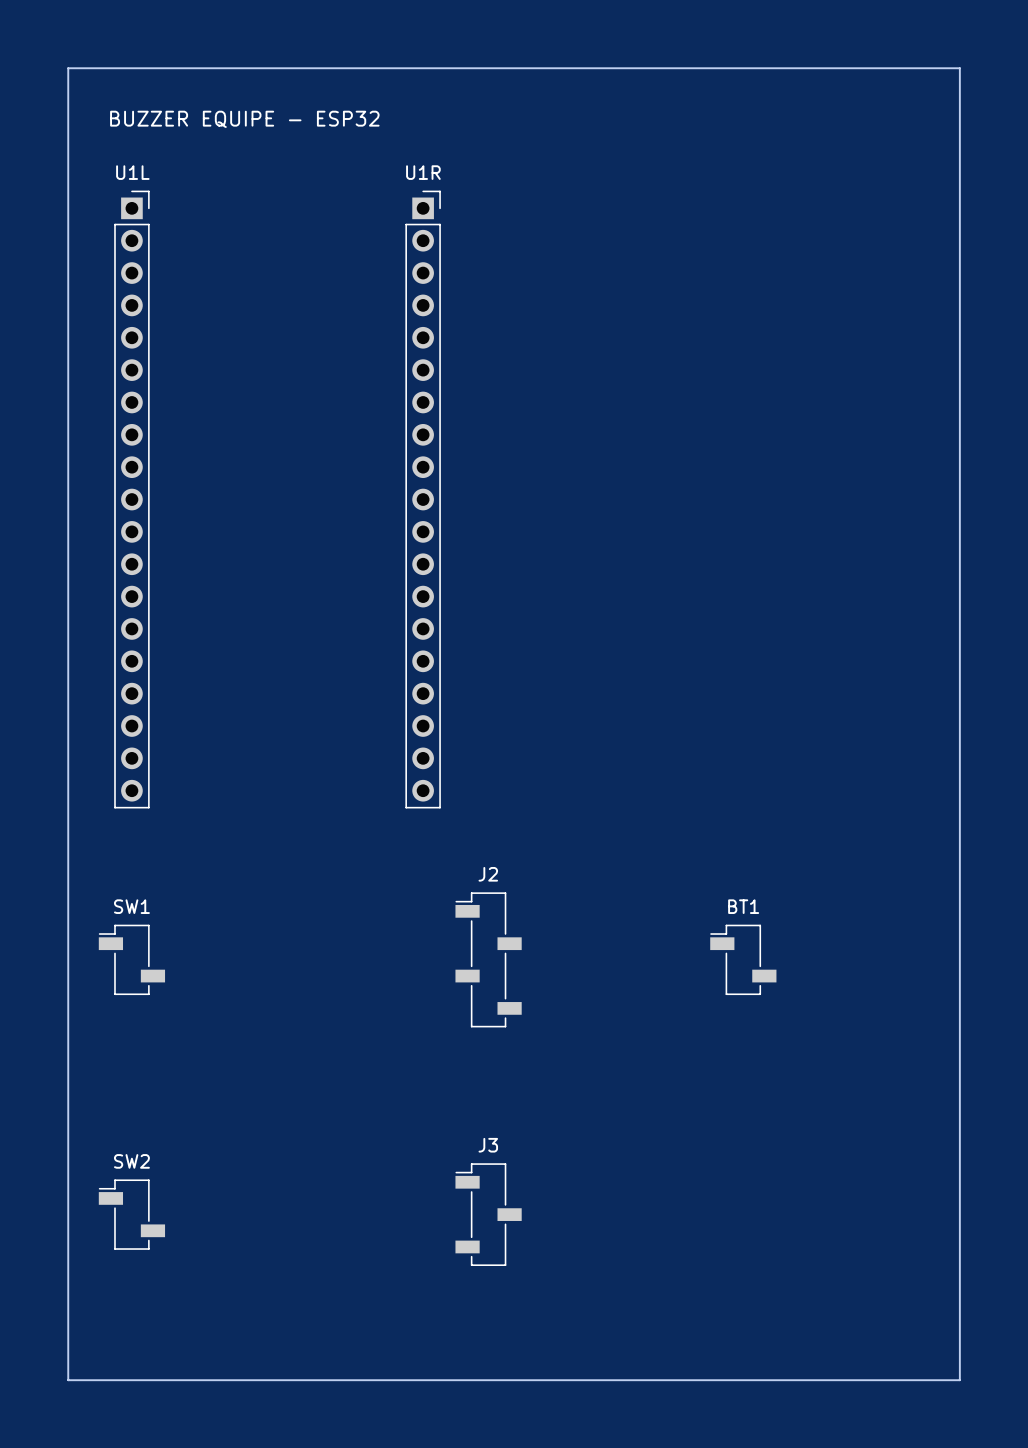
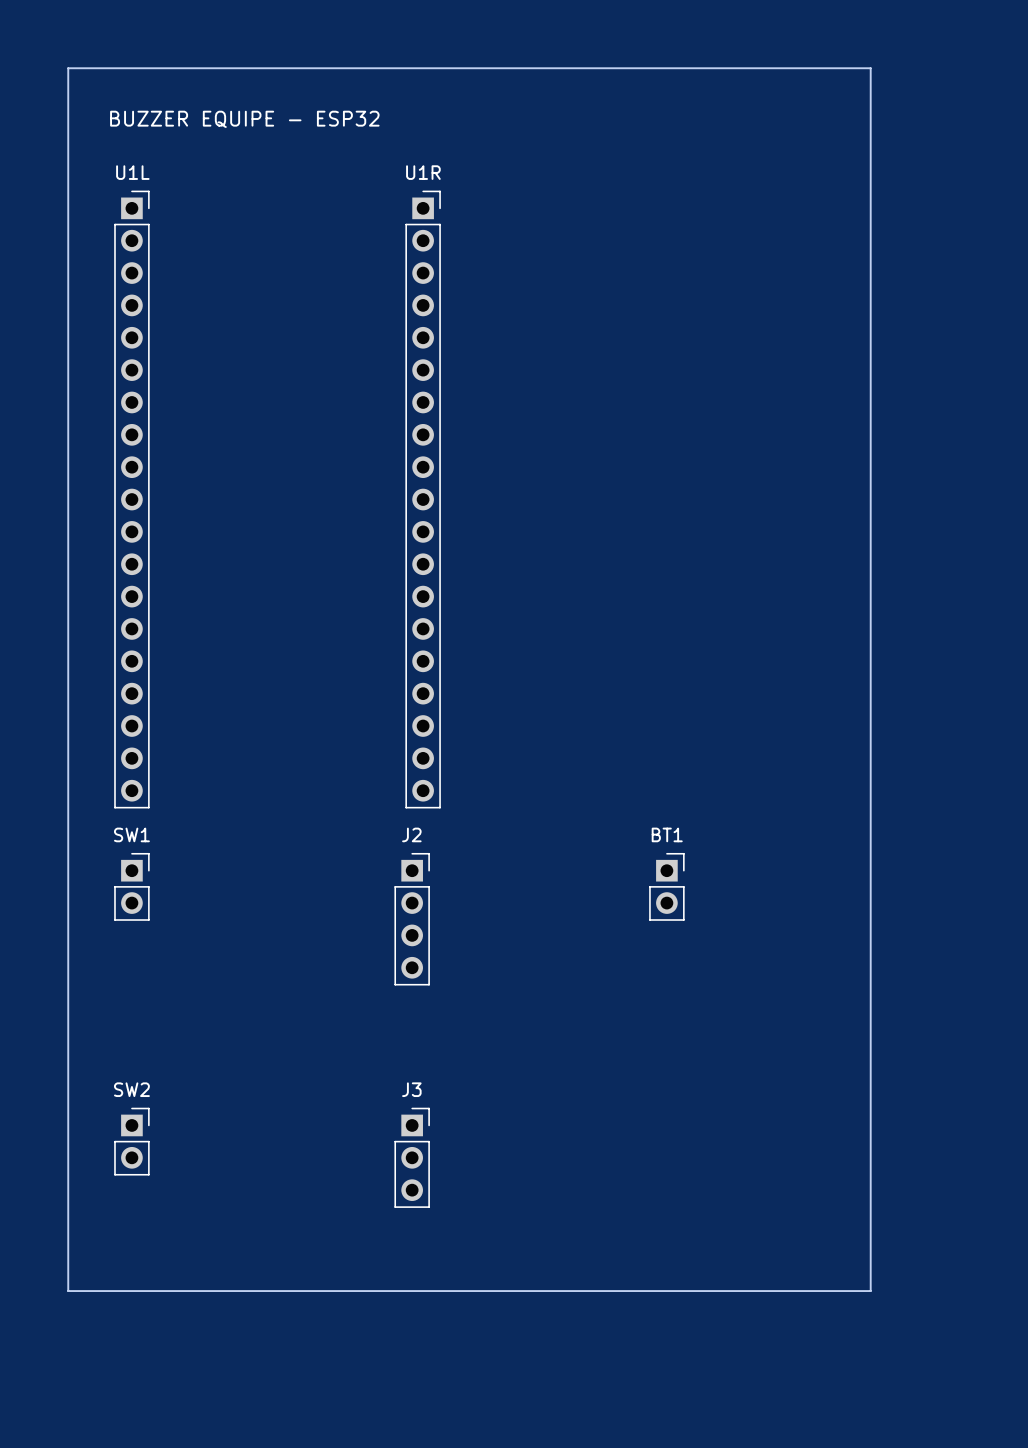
board edge: (870, 68) (959, 68) (959, 1380) (68, 1380) (68, 1291) -> (870, 68) (870, 1291) (68, 1291)
J2 footprint: [455, 892, 522, 1028] -> [394, 853, 430, 986]
SW1 footprint: [98, 924, 166, 996] -> [114, 853, 150, 921]
BT1 footprint: [710, 924, 777, 996] -> [649, 853, 685, 921]
J3 footprint: [455, 1163, 522, 1266] -> [394, 1107, 430, 1208]
SW2 footprint: [98, 1179, 166, 1250] -> [114, 1107, 150, 1176]

